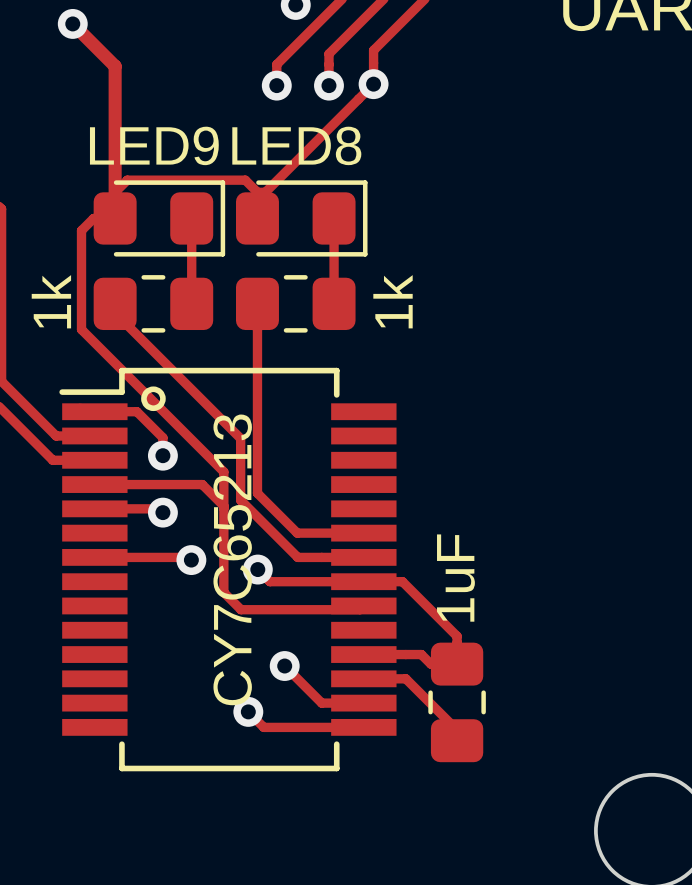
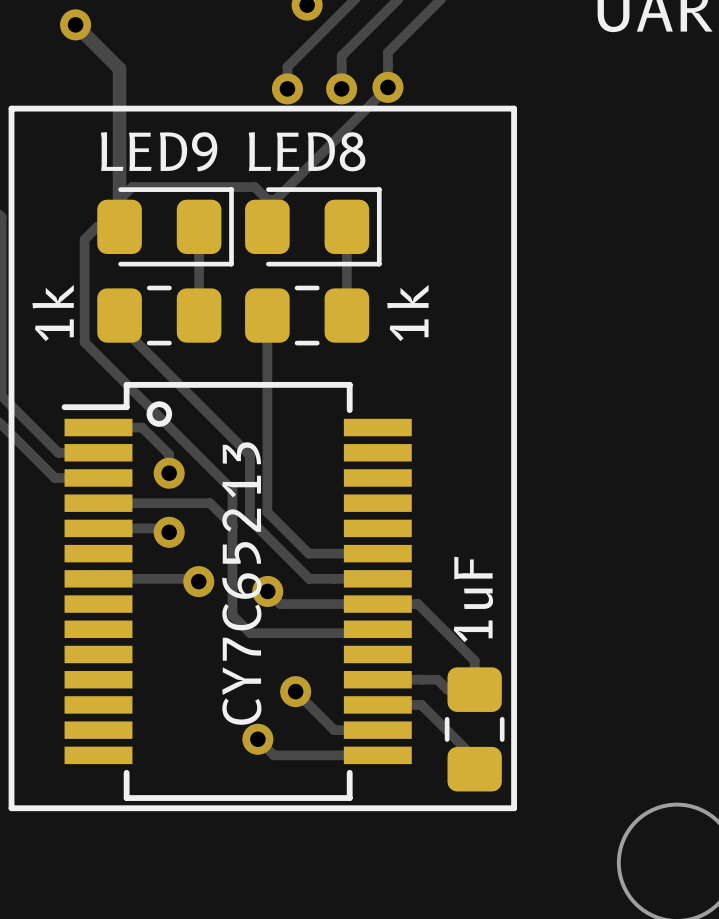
line: none -> (11, 108) (11, 808) (514, 808) (514, 108) (11, 108)

